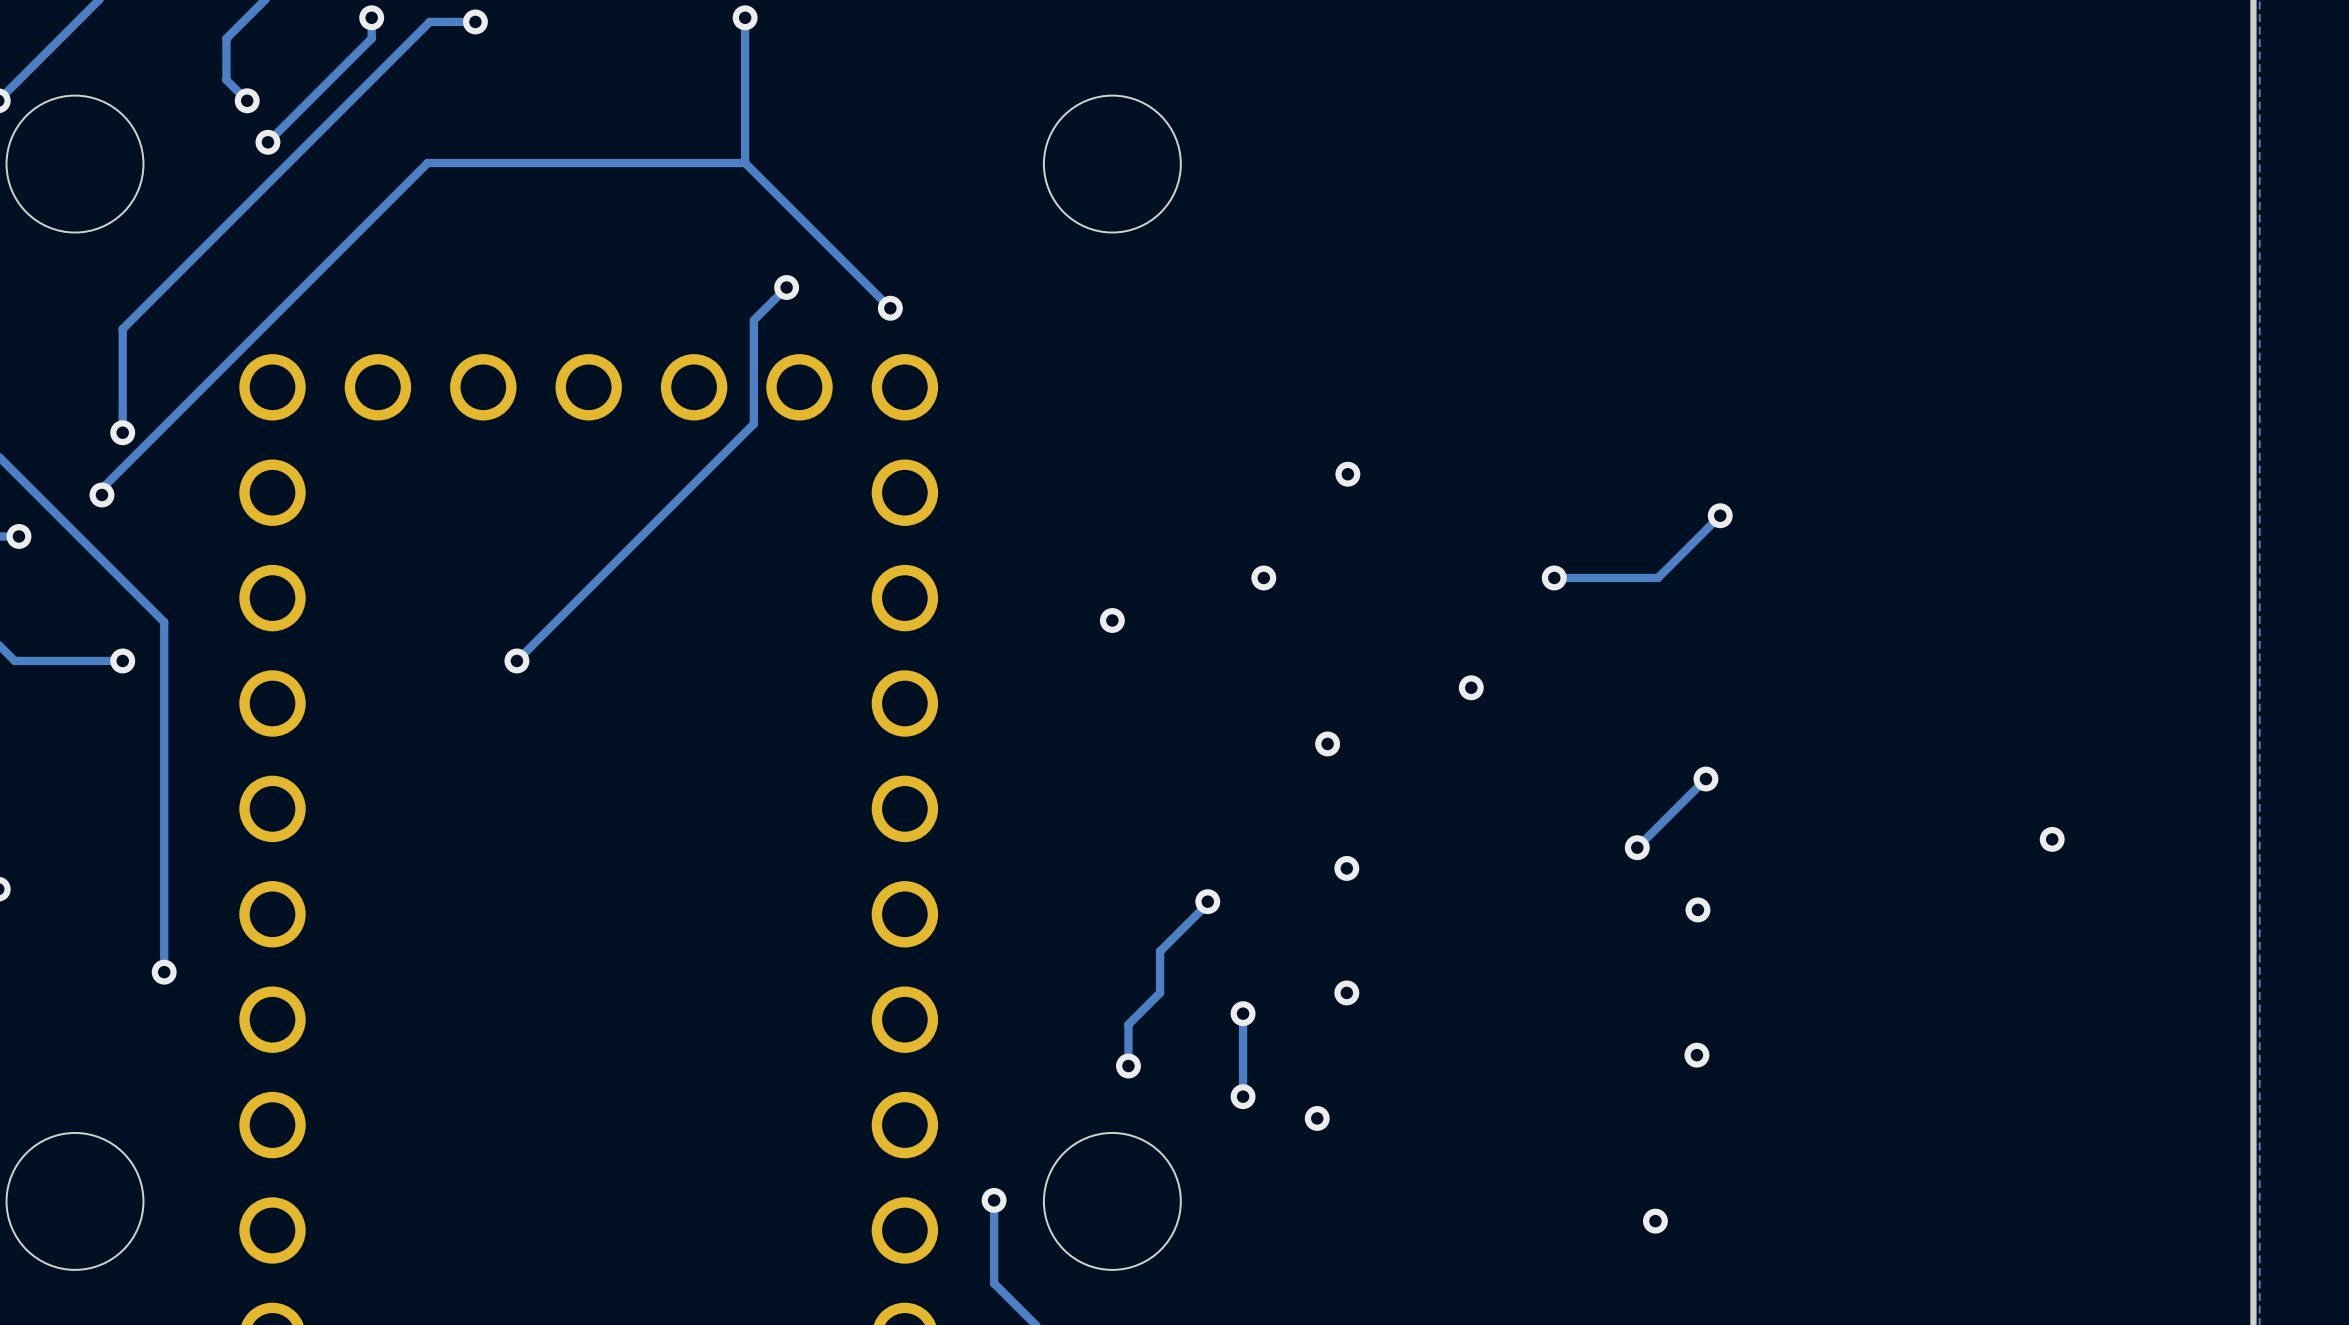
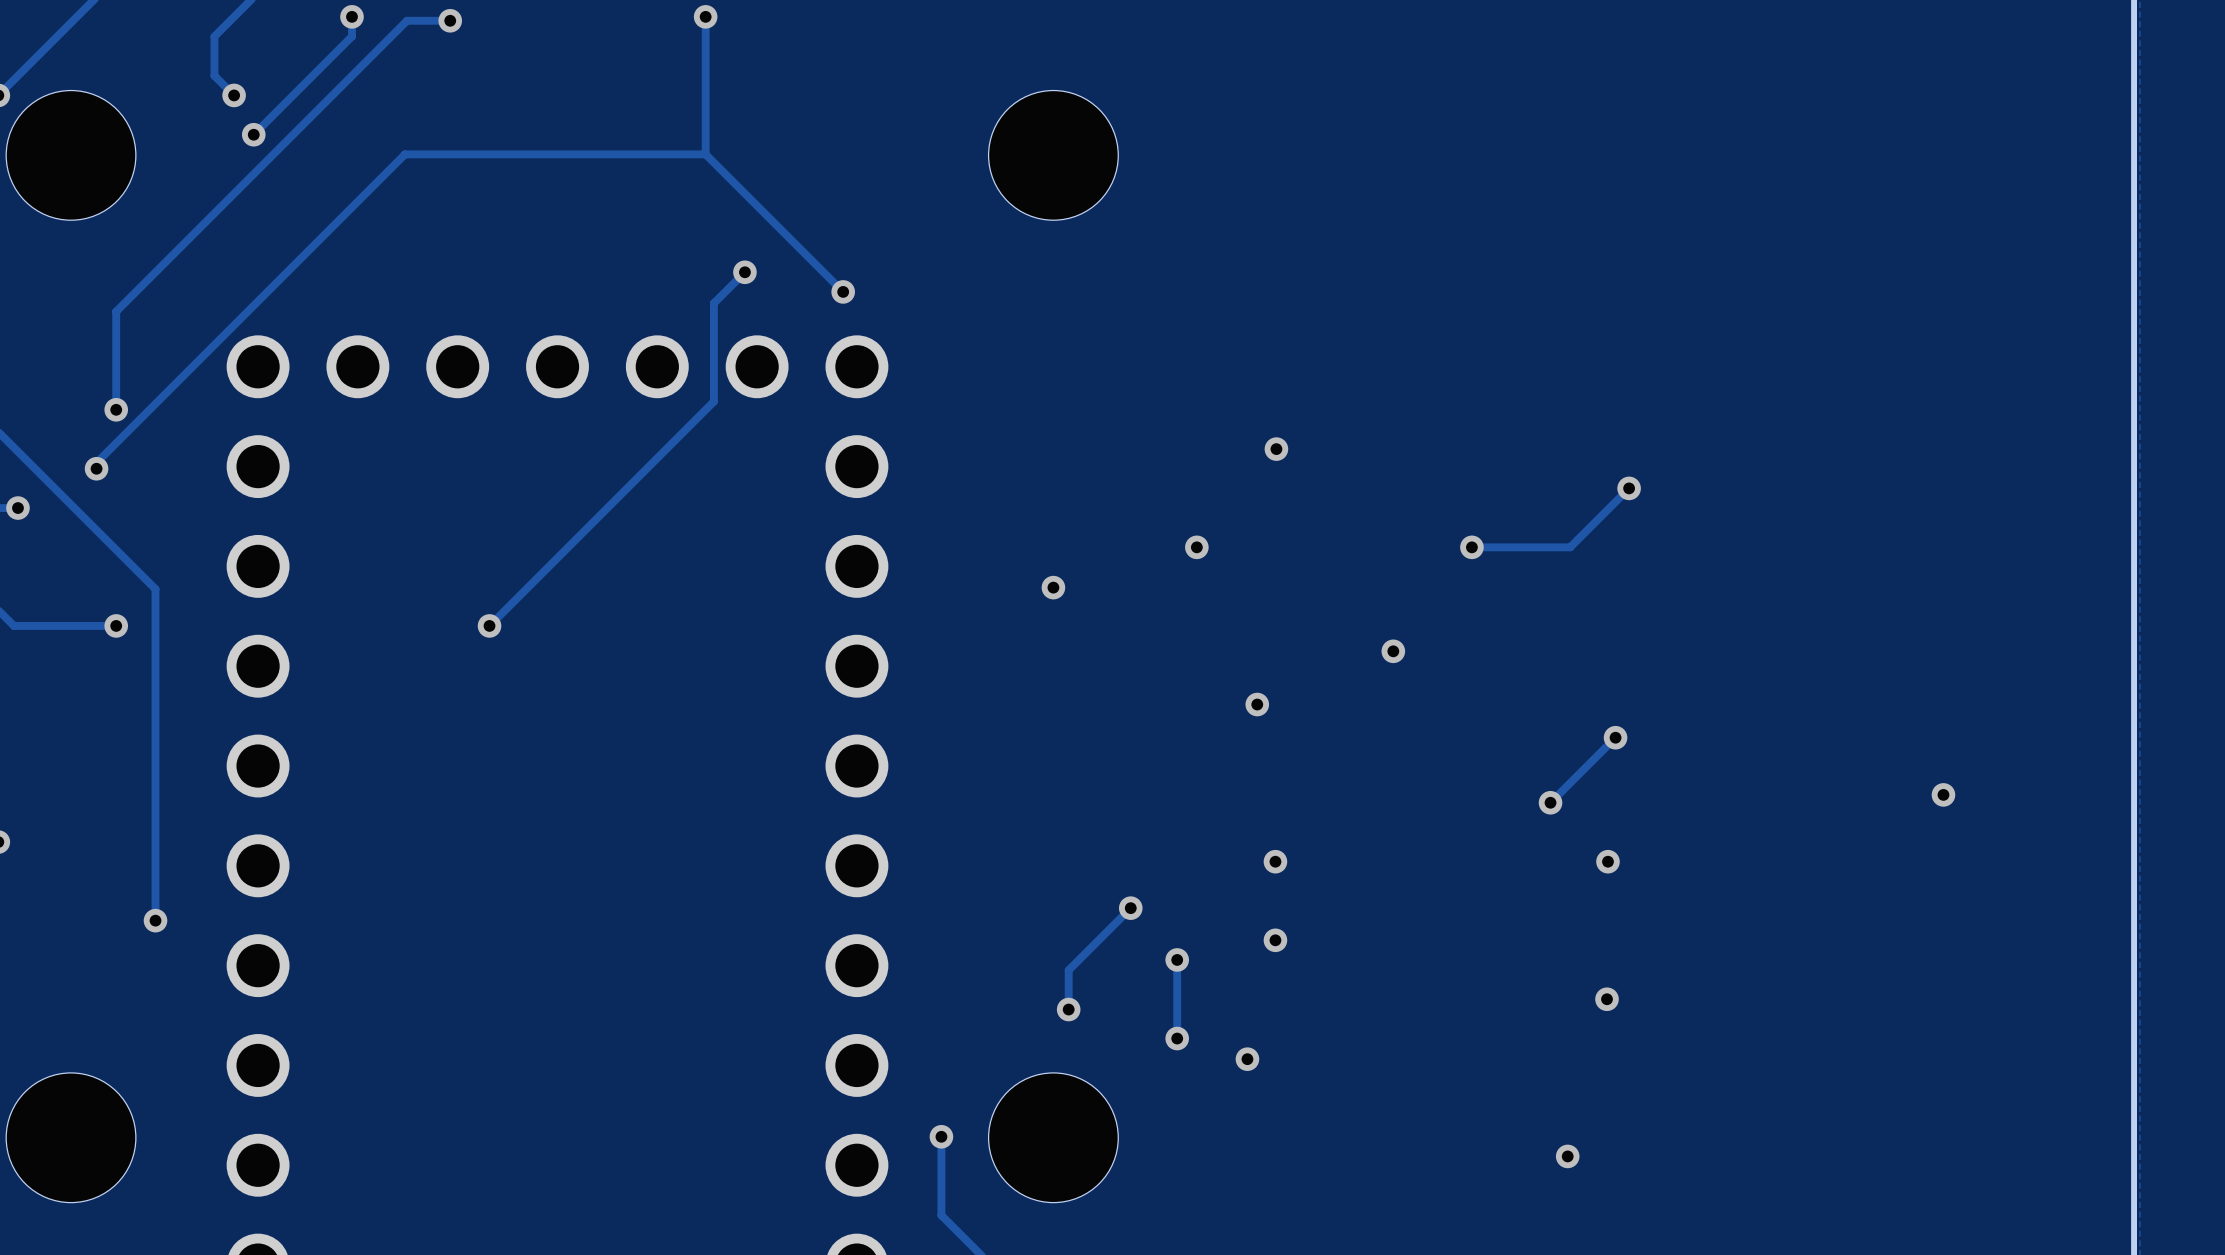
via position: (1346, 868) -> (1275, 861)
track: (1207, 901) (1160, 951) (1160, 992) -> (1130, 908) (1098, 940)
via position: (1207, 901) -> (1130, 908)

